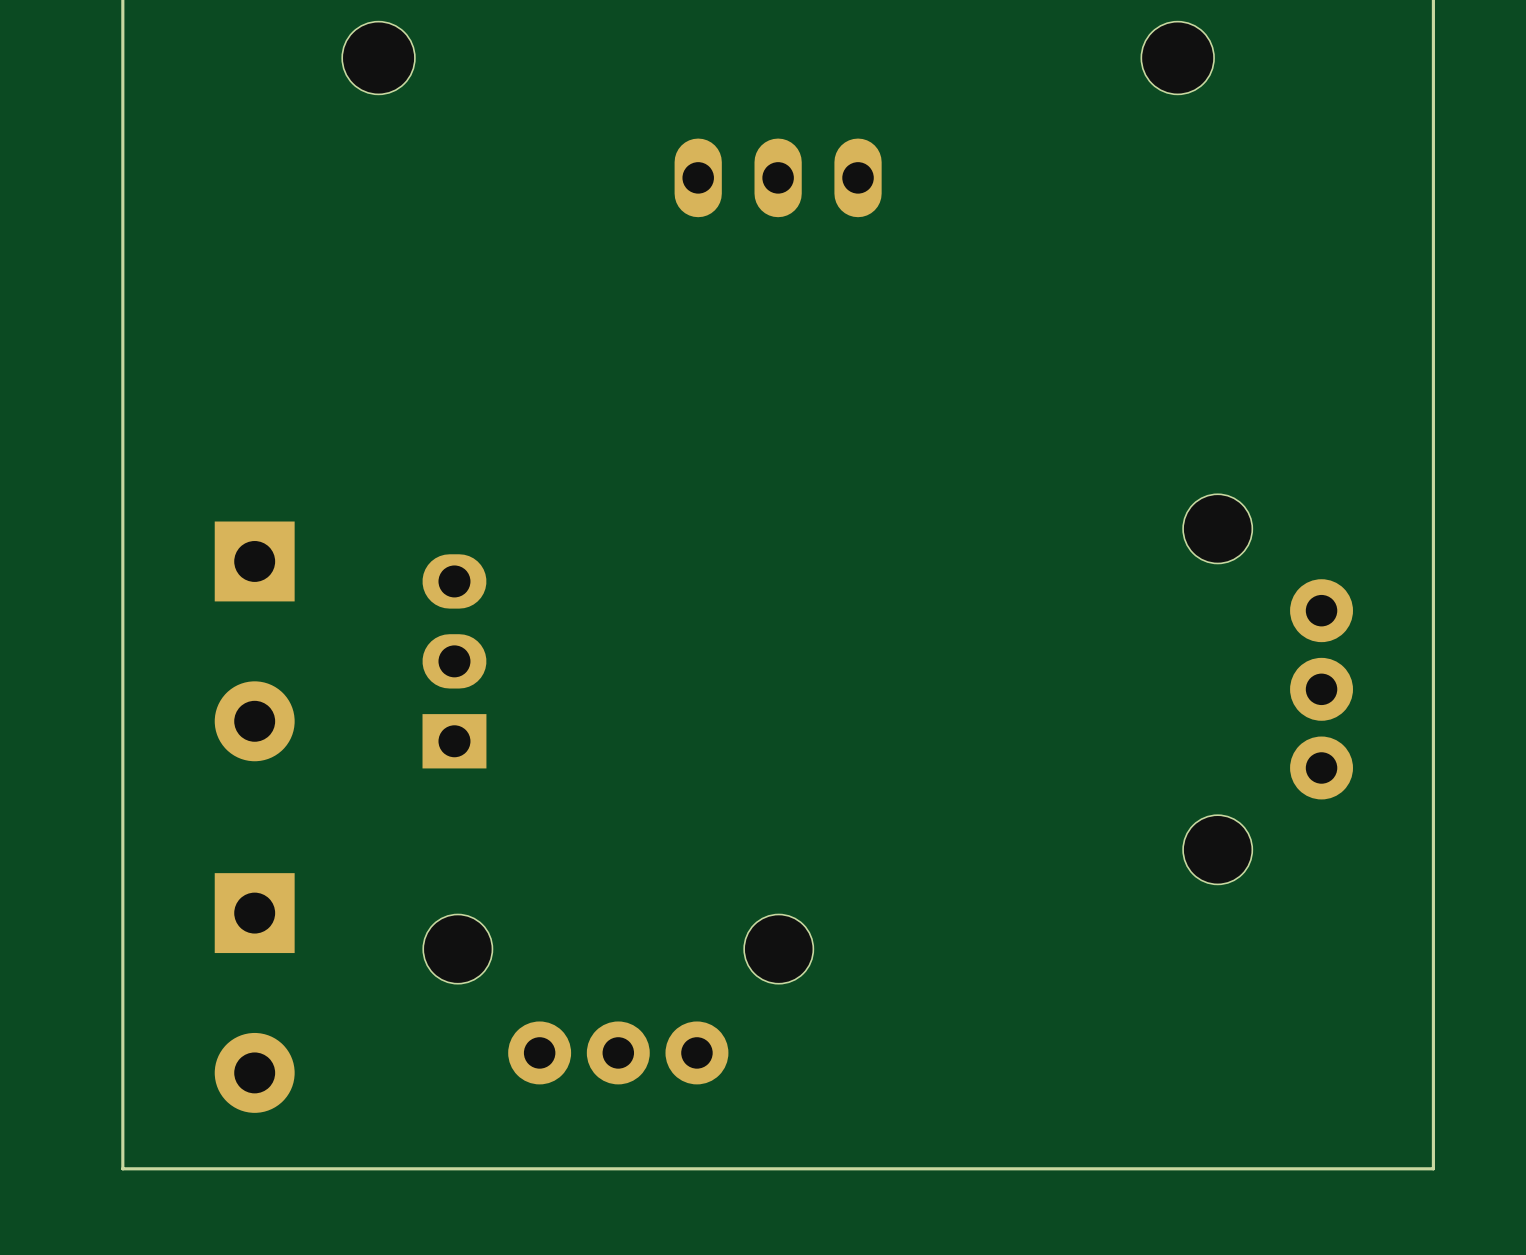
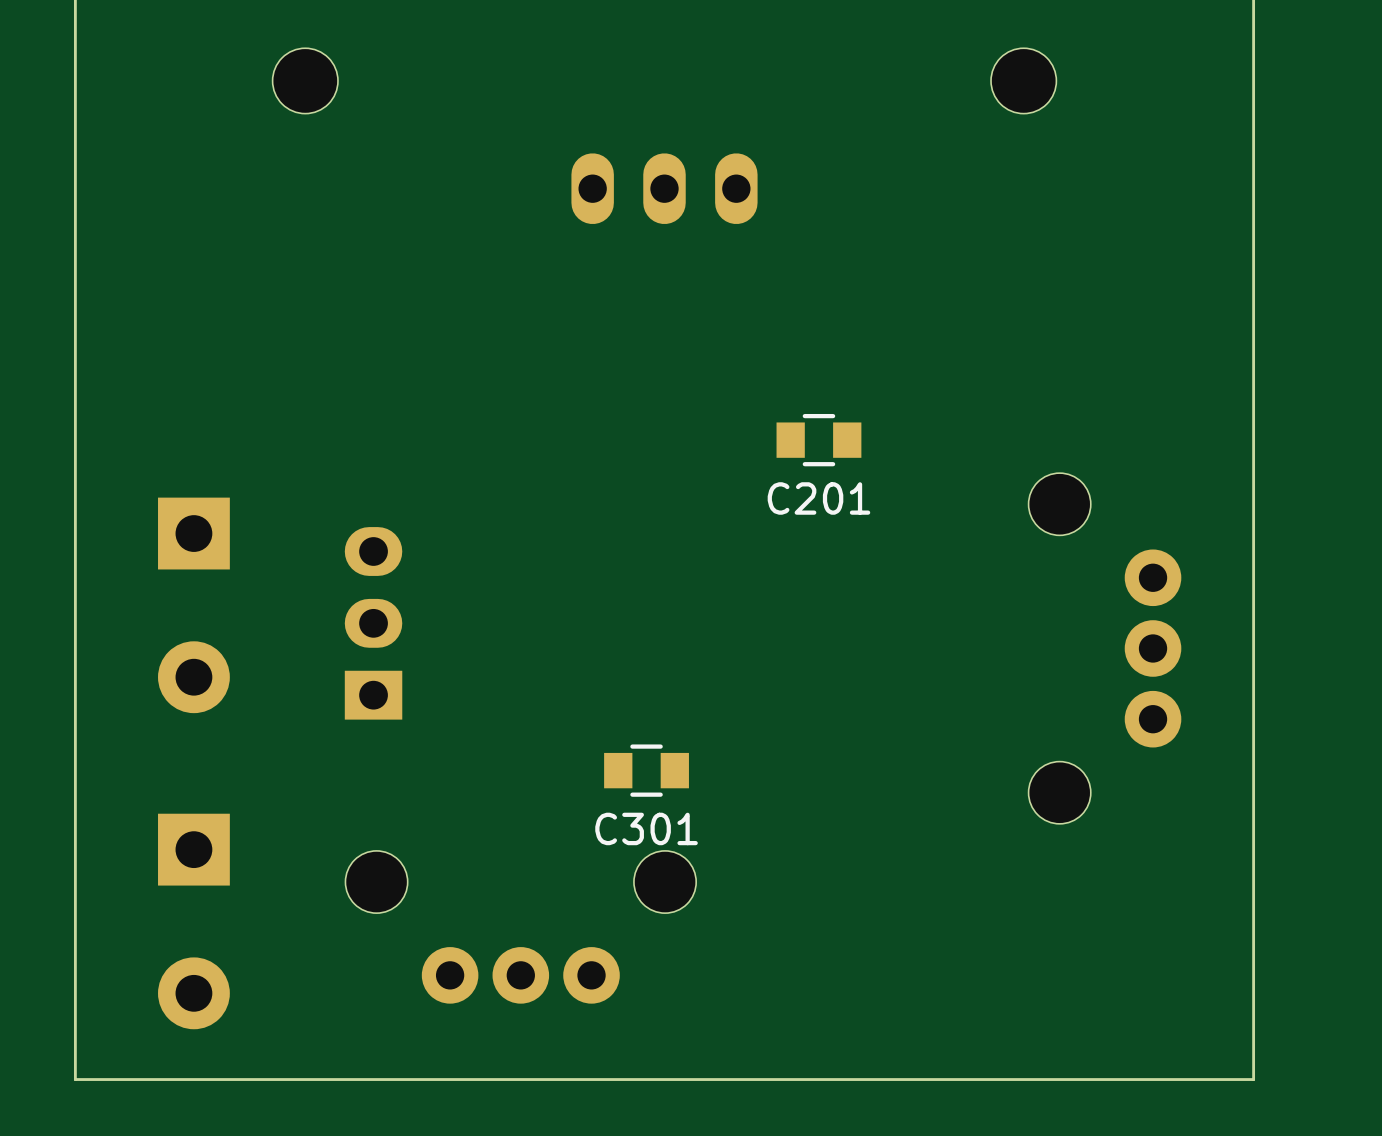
C201: none -> (818, 440)
C301: none -> (646, 770)

